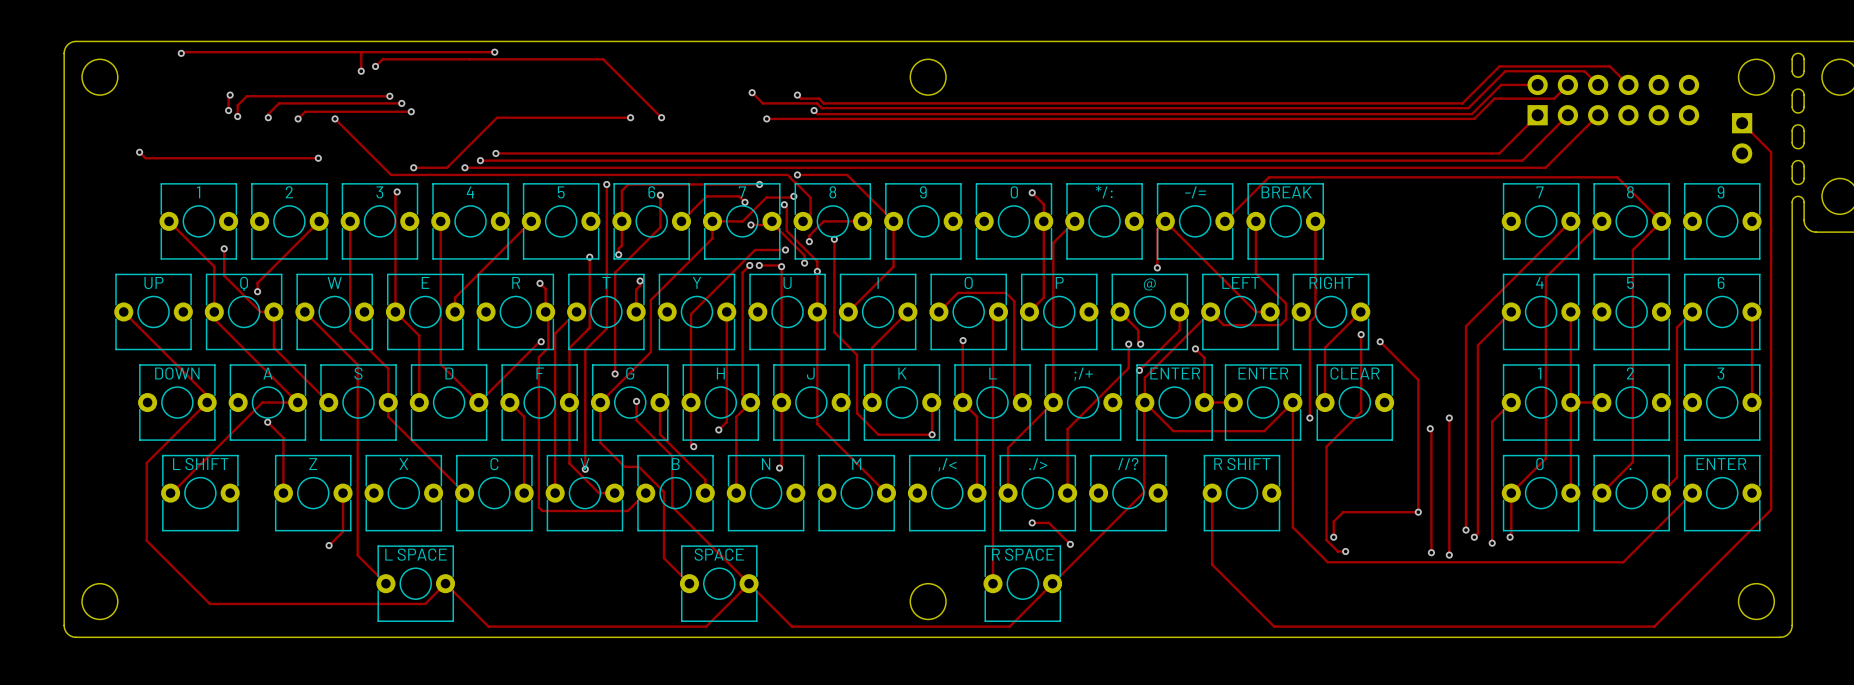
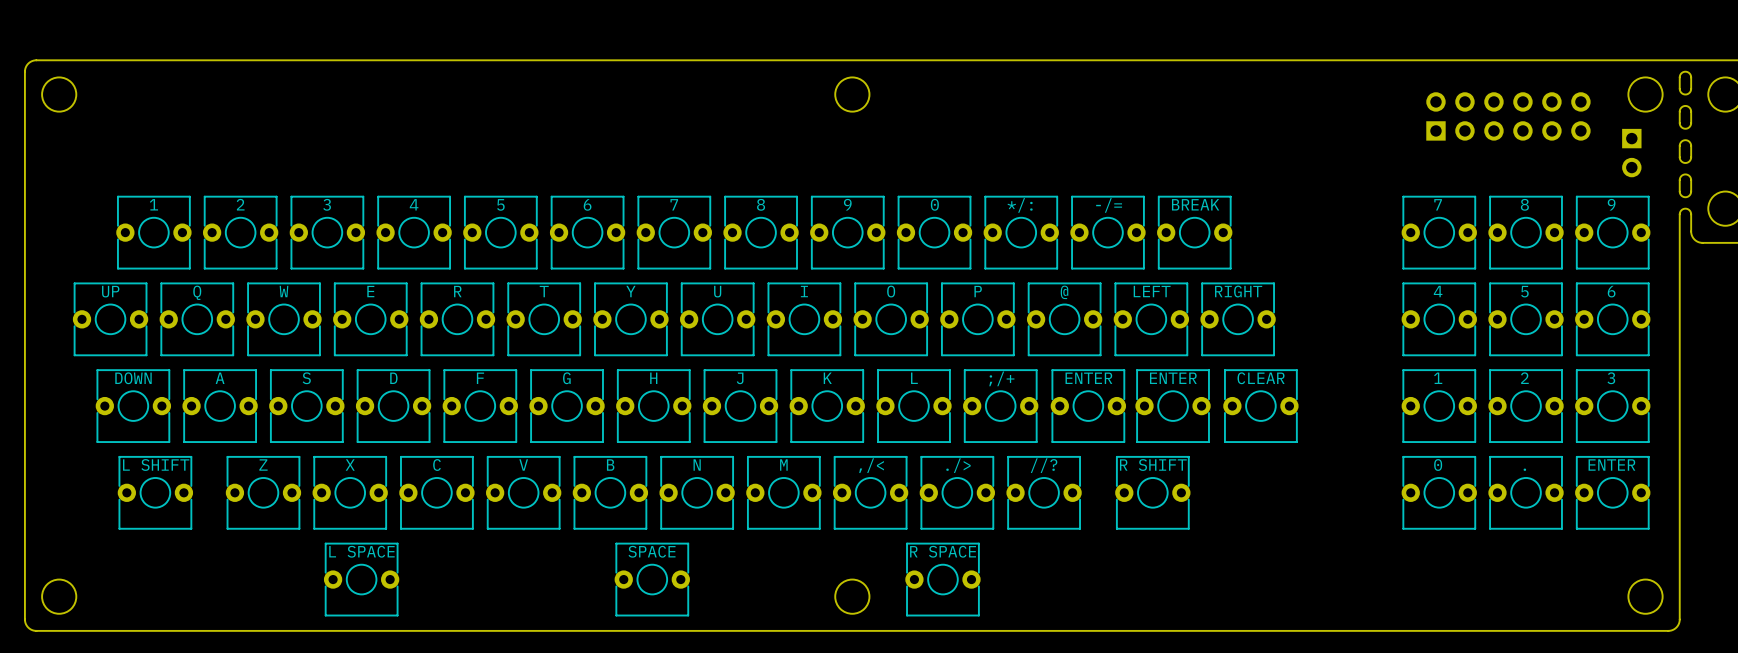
track: (362, 52) (361, 71) -> none
track: (494, 52) (181, 53) -> none
via: (494, 52) -> none
via: (181, 53) -> none
track: (375, 66) (382, 59) (603, 59) (661, 117) -> none
via: (375, 66) -> none
via: (361, 71) -> none
track: (1537, 84) (1501, 84) (1471, 114) (817, 114) (814, 110) -> none
track: (1567, 84) (1554, 98) (1494, 98) (1474, 118) (766, 118) -> none
track: (1598, 84) (1584, 71) (1505, 71) (1468, 108) (821, 108) (817, 103) (762, 103) (752, 92) -> none
track: (1628, 84) (1609, 66) (1499, 66) (1462, 103) (823, 103) (819, 98) (800, 98) (797, 95) -> none
via: (752, 92) -> none
track: (230, 95) (228, 110) -> none
via: (230, 95) -> none
via: (797, 95) -> none
track: (389, 96) (246, 96) (237, 105) (237, 116) -> none
via: (389, 96) -> none
track: (401, 103) (279, 103) (268, 114) (268, 117) -> none
via: (401, 103) -> none
via: (228, 110) -> none
via: (814, 110) -> none
track: (411, 111) (305, 111) (298, 118) -> none
via: (411, 111) -> none
track: (1537, 115) (1499, 153) (495, 153) -> none
track: (1567, 115) (1522, 160) (480, 160) -> none
track: (1598, 115) (1545, 167) (464, 167) -> none
via: (237, 116) -> none
via: (268, 117) -> none
track: (630, 117) (497, 117) (447, 167) (413, 167) -> none
via: (630, 117) -> none
via: (661, 117) -> none
via: (298, 118) -> none
track: (335, 118) (391, 174) (787, 174) (810, 197) (810, 213) (803, 221) -> none
via: (335, 118) -> none
via: (766, 118) -> none
track: (1742, 123) (1771, 152) (1771, 509) (1654, 626) (1274, 626) (1212, 564) (1212, 493) -> none
track: (139, 152) (145, 158) (318, 158) -> none
via: (139, 152) -> none
via: (495, 153) -> none
via: (318, 158) -> none
via: (480, 160) -> none
via: (413, 167) -> none
via: (464, 167) -> none
track: (797, 174) (847, 174) (893, 221) (893, 266) (848, 311) -> none
via: (797, 174) -> none
track: (606, 184) (606, 328) (585, 350) (585, 469) -> none
via: (606, 184) -> none
track: (759, 184) (628, 184) (621, 190) (621, 245) (618, 248) (618, 254) -> none
via: (759, 184) -> none
track: (397, 191) (395, 193) (395, 311) (419, 335) (419, 402) -> none
via: (397, 191) -> none
track: (1032, 192) (1043, 204) (1043, 297) (1029, 311) -> none
via: (1032, 192) -> none
track: (660, 195) (660, 227) (615, 272) (615, 373) -> none
via: (660, 195) -> none
track: (793, 196) (766, 197) (742, 221) (712, 221) (712, 238) (650, 300) (650, 352) (600, 402) (600, 442) (624, 466) (638, 466) (663, 491) (663, 558) (689, 583) -> none
via: (793, 196) -> none
track: (745, 202) (739, 196) (706, 196) (681, 221) -> none
via: (745, 202) -> none
track: (784, 204) (786, 207) (786, 230) (817, 261) (817, 423) (886, 493) -> none
via: (784, 204) -> none
track: (169, 221) (214, 266) (214, 319) (297, 402) (262, 402) (170, 493) -> none
track: (319, 221) (257, 283) (257, 291) -> none
track: (350, 221) (350, 330) (388, 368) (388, 416) (464, 493) -> none
track: (440, 221) (440, 364) (478, 402) (541, 341) -> none
track: (531, 221) (455, 297) (455, 311) -> none
track: (862, 221) (823, 221) (809, 235) (809, 241) -> none
track: (1074, 221) (1053, 242) (1053, 402) (1008, 447) (1008, 493) -> none
track: (1224, 221) (1269, 177) (1617, 177) (1661, 221) (1632, 250) (1632, 462) (1601, 493) -> none
track: (1255, 221) (1255, 273) (1286, 303) (1286, 319) (1280, 325) (1223, 325) (1210, 311) (1144, 377) (1144, 402) -> none
track: (1315, 221) (1315, 316) (1309, 321) (1309, 418) -> none
track: (1570, 221) (1466, 326) (1466, 530) -> none
track: (1601, 221) (1545, 277) (1545, 458) (1511, 493) (1510, 537) -> none
track: (750, 224) (768, 224) (772, 221) (804, 255) (804, 263) -> none
via: (750, 224) -> none
track: (834, 239) (834, 332) (857, 354) (857, 413) (878, 434) (932, 434) (931, 402) -> none
via: (834, 239) -> none
via: (809, 241) -> none
track: (224, 248) (224, 275) (260, 311) (273, 311) (273, 347) (328, 402) -> none
via: (224, 248) -> none
track: (785, 250) (755, 250) (691, 314) (691, 443) (693, 446) -> none
via: (785, 250) -> none
via: (618, 254) -> none
track: (589, 256) (589, 327) (569, 348) (569, 463) (599, 493) (614, 493) -> none
via: (589, 257) -> none
via: (804, 263) -> none
track: (749, 265) (742, 272) (742, 394) (750, 402) (736, 416) (736, 493) -> none
via: (749, 265) -> none
track: (759, 265) (781, 266) (781, 466) (779, 468) -> none
via: (759, 265) -> none
via: (781, 266) -> none
track: (1157, 267) (1157, 229) (1165, 221) (1255, 311) (1270, 311) -> none
via: (1157, 267) -> none
via: (817, 271) -> none
track: (640, 280) (640, 285) (636, 289) (636, 311) -> none
via: (640, 280) -> none
track: (540, 283) (545, 288) (545, 311) (548, 314) (548, 347) (538, 357) (538, 507) (542, 510) (627, 510) (645, 493) -> none
via: (540, 283) -> none
via: (257, 291) -> none
track: (123, 311) (207, 395) (207, 402) (146, 462) (146, 540) (209, 603) (425, 603) (445, 583) (488, 626) (706, 626) (749, 583) -> none
track: (304, 311) (357, 364) (357, 555) (385, 583) -> none
track: (576, 311) (555, 333) (555, 493) -> none
track: (726, 311) (726, 421) (718, 429) -> none
track: (907, 311) (872, 347) (872, 402) -> none
track: (938, 311) (957, 292) (1005, 292) (1014, 301) (1014, 394) (1022, 402) -> none
track: (998, 311) (993, 317) (993, 583) -> none
track: (1120, 311) (1138, 330) (1138, 341) (1140, 344) -> none
track: (1179, 311) (1179, 330) (1139, 370) -> none
track: (1360, 311) (1325, 347) (1325, 402) -> none
track: (1511, 311) (1477, 345) (1477, 533) (1474, 537) -> none
track: (1570, 311) (1570, 493) -> none
track: (1692, 311) (1676, 327) (1676, 477) (1661, 493) -> none
track: (1752, 311) (1752, 402) -> none
track: (1361, 334) (1361, 412) (1326, 446) (1326, 540) (1337, 551) (1345, 551) -> none
via: (1361, 334) -> none
track: (963, 340) (962, 402) (977, 416) (977, 493) -> none
via: (963, 340) -> none
via: (541, 341) -> none
track: (1380, 341) (1418, 379) (1418, 512) (1343, 512) (1333, 521) (1333, 537) -> none
via: (1380, 341) -> none
track: (1128, 344) (1128, 367) (1067, 429) (1067, 493) -> none
via: (1128, 344) -> none
via: (1140, 344) -> none
track: (1195, 348) (1204, 357) (1204, 402) (1233, 402) -> none
via: (1195, 348) -> none
via: (1139, 370) -> none
via: (615, 373) -> none
track: (636, 401) (636, 420) (672, 456) (672, 506) (791, 626) (1009, 626) (1144, 492) (1144, 402) -> none
via: (636, 401) -> none
track: (509, 402) (524, 416) (524, 493) -> none
track: (660, 402) (660, 434) (705, 479) (705, 493) -> none
track: (1144, 402) (1173, 431) (1264, 431) (1292, 402) (1292, 527) (1327, 562) (1623, 562) (1692, 493) -> none
track: (1511, 402) (1492, 421) (1492, 543) -> none
track: (1570, 402) (1601, 402) -> none
via: (1309, 418) -> none
track: (1449, 418) (1449, 555) -> none
via: (1449, 418) -> none
track: (267, 422) (283, 437) (283, 493) -> none
via: (267, 422) -> none
track: (1430, 428) (1431, 552) -> none
via: (1430, 428) -> none
via: (718, 429) -> none
via: (932, 434) -> none
via: (693, 446) -> none
via: (779, 468) -> none
via: (585, 469) -> none
track: (343, 493) (343, 531) (329, 545) -> none
via: (1418, 512) -> none
track: (1032, 522) (1048, 522) (1070, 544) -> none
via: (1032, 522) -> none
via: (1466, 530) -> none
via: (1333, 537) -> none
via: (1474, 537) -> none
via: (1510, 537) -> none
via: (1492, 543) -> none
via: (1070, 544) -> none
via: (329, 545) -> none
via: (1345, 551) -> none
via: (1431, 552) -> none
via: (1449, 555) -> none

